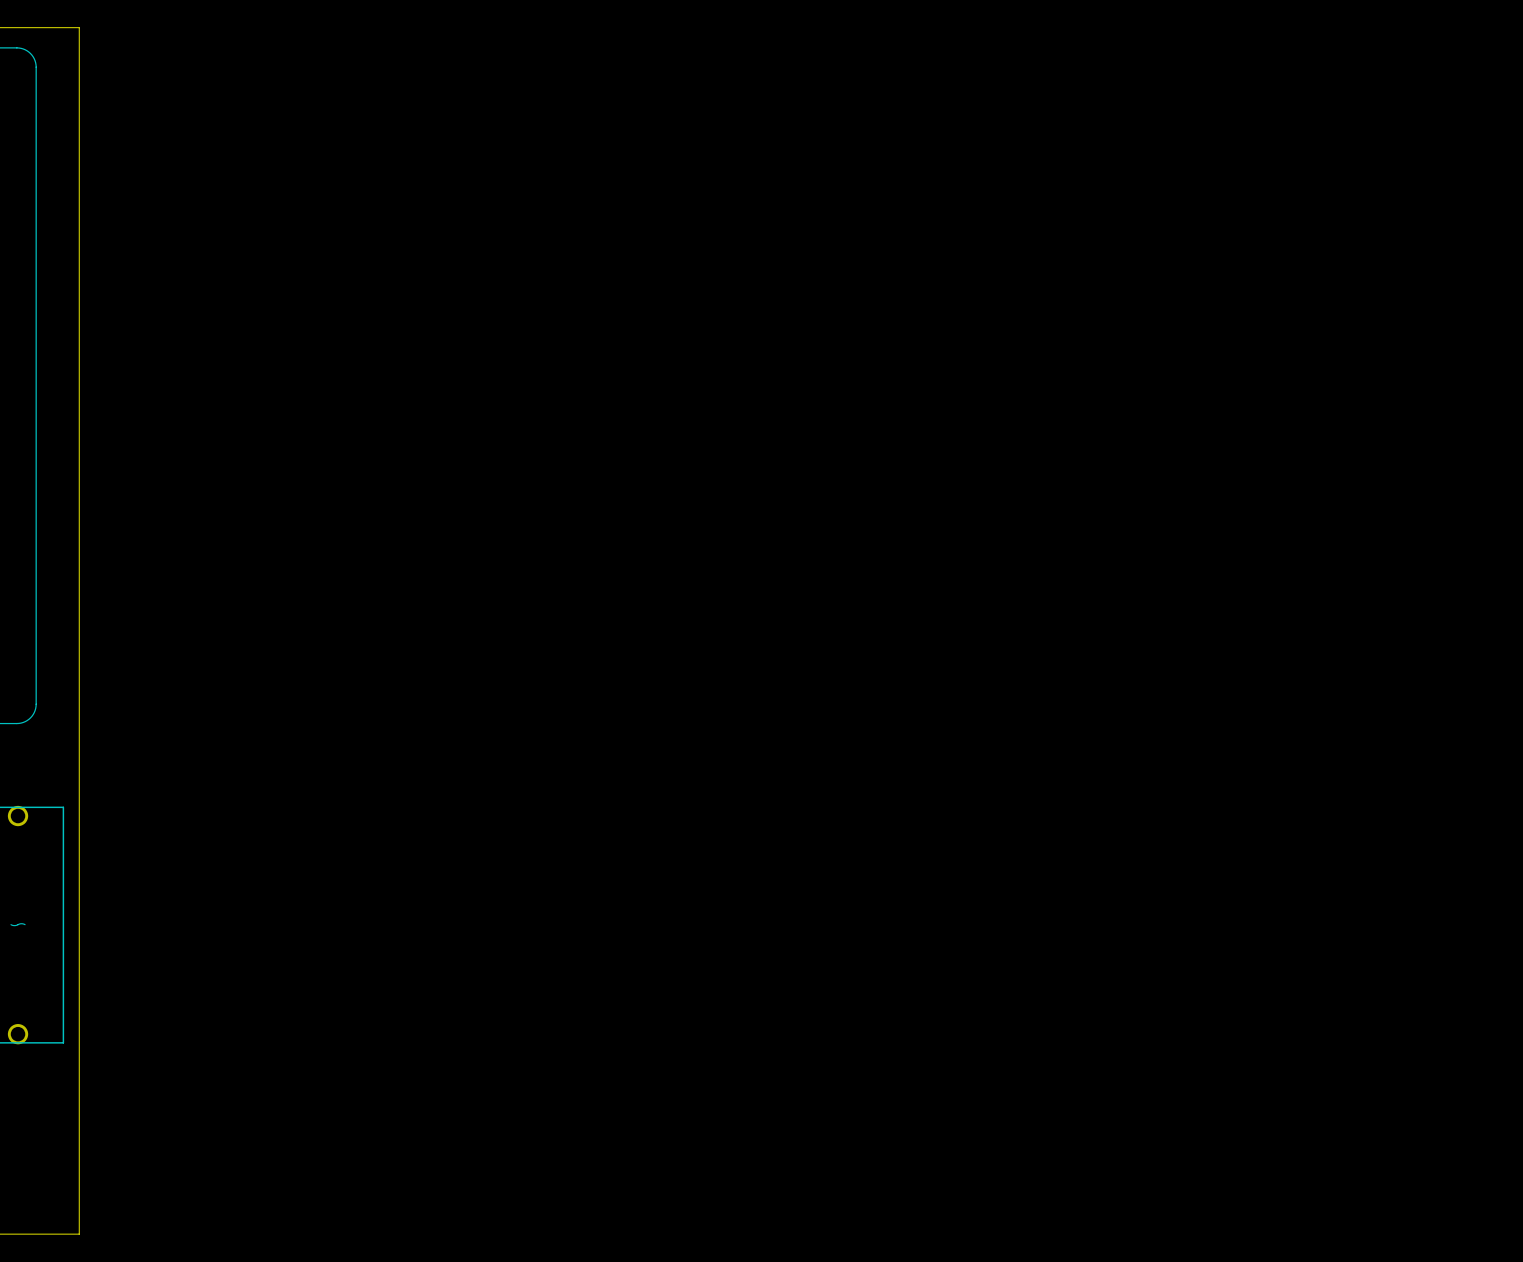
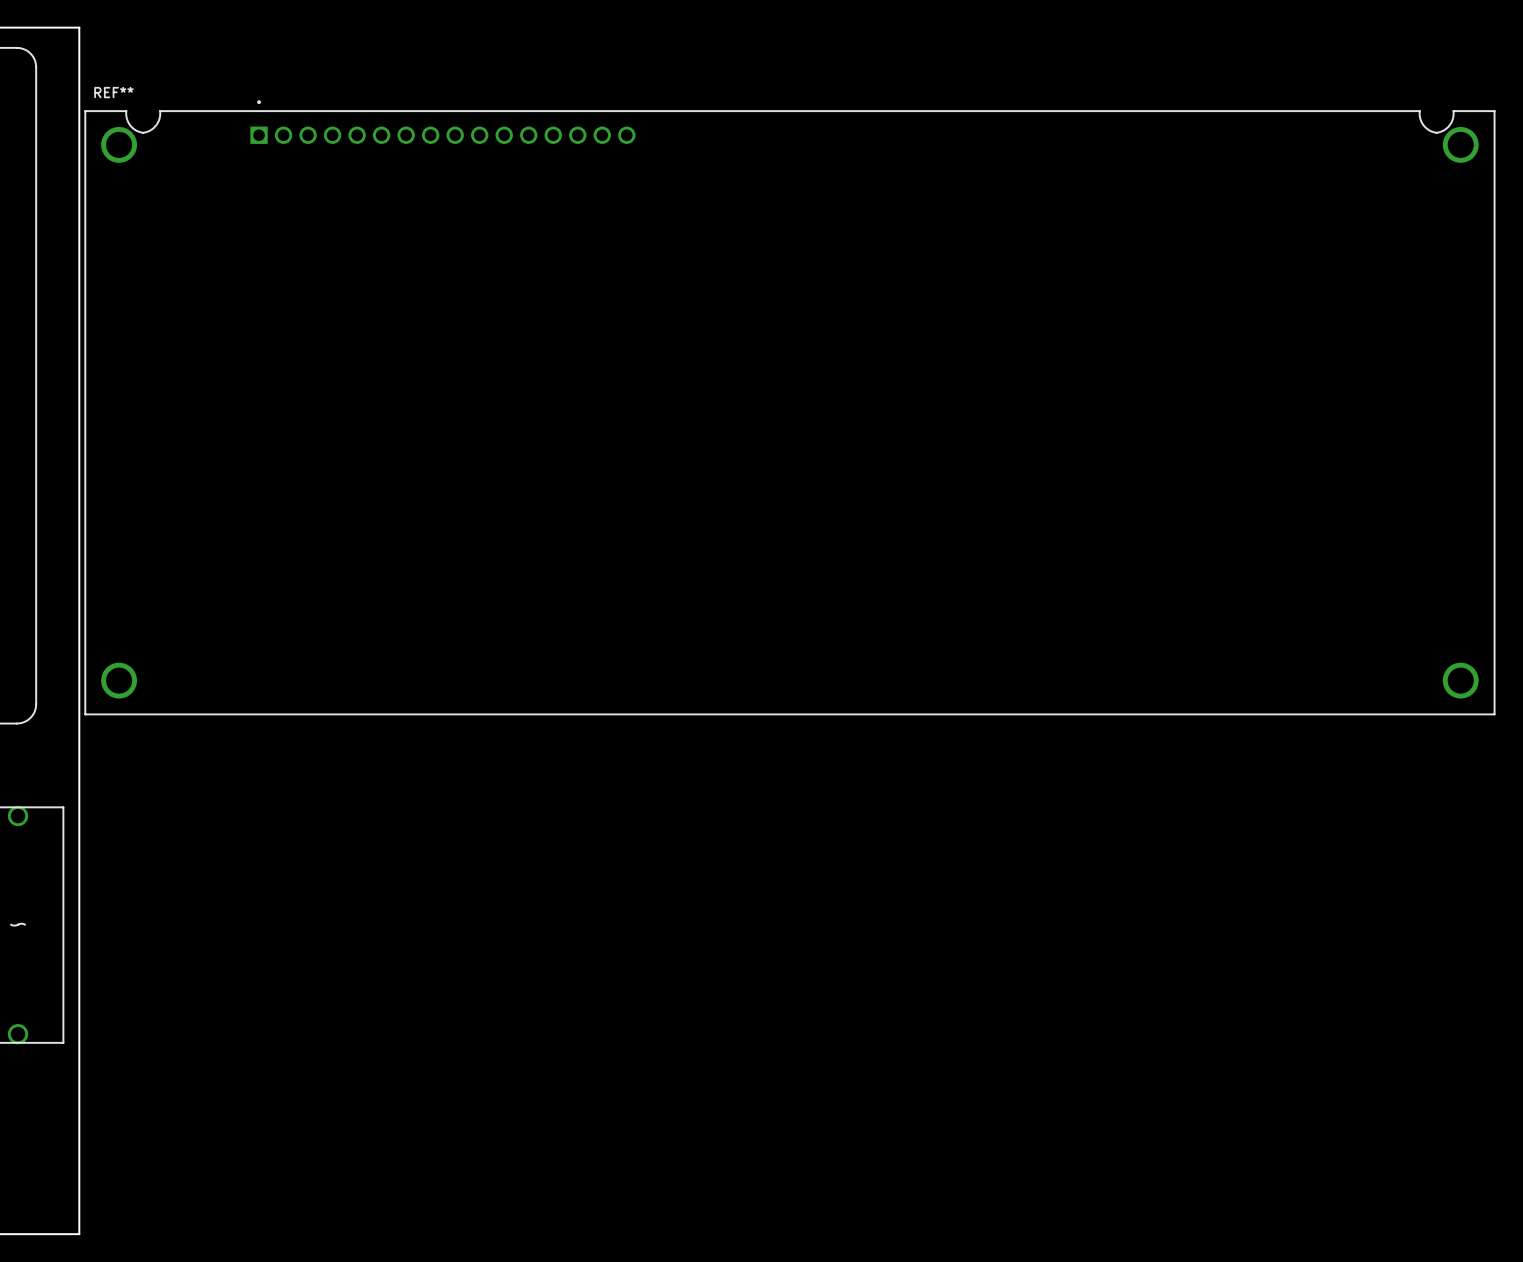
REF**: none -> (789, 407)

